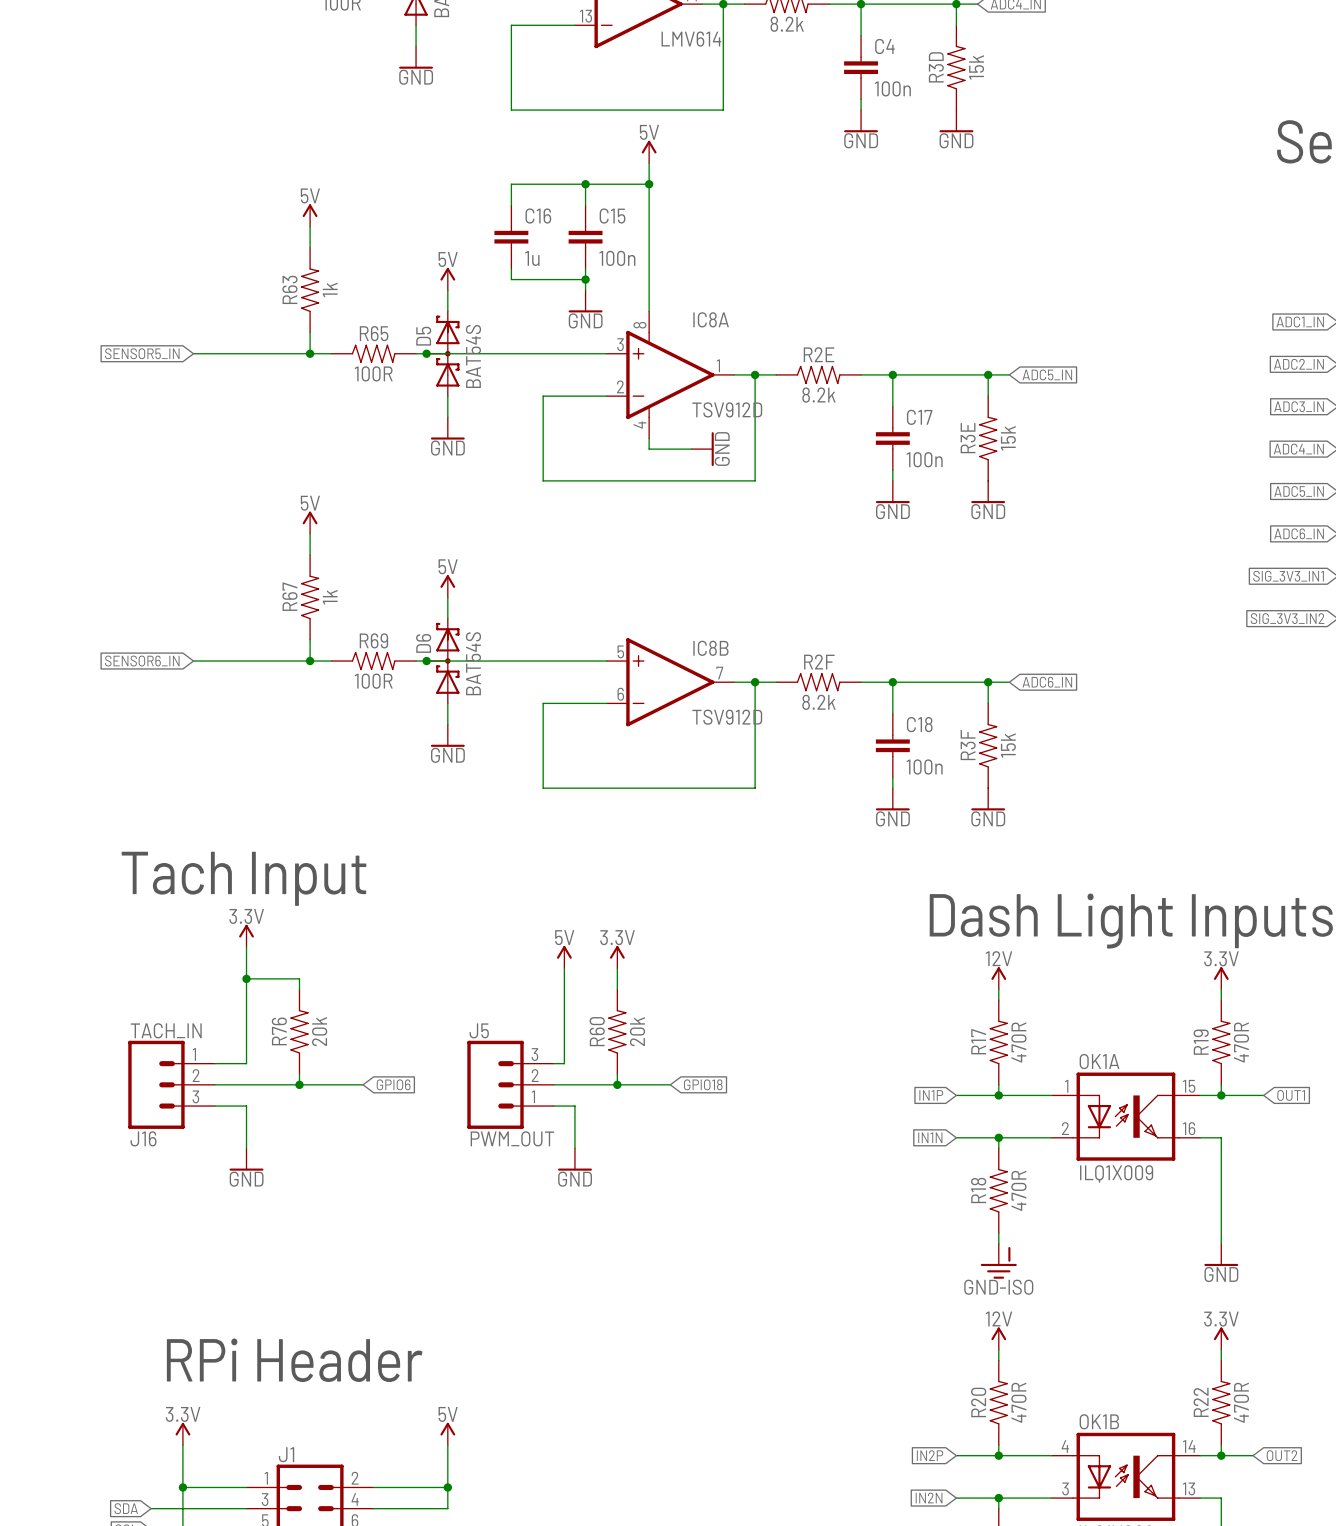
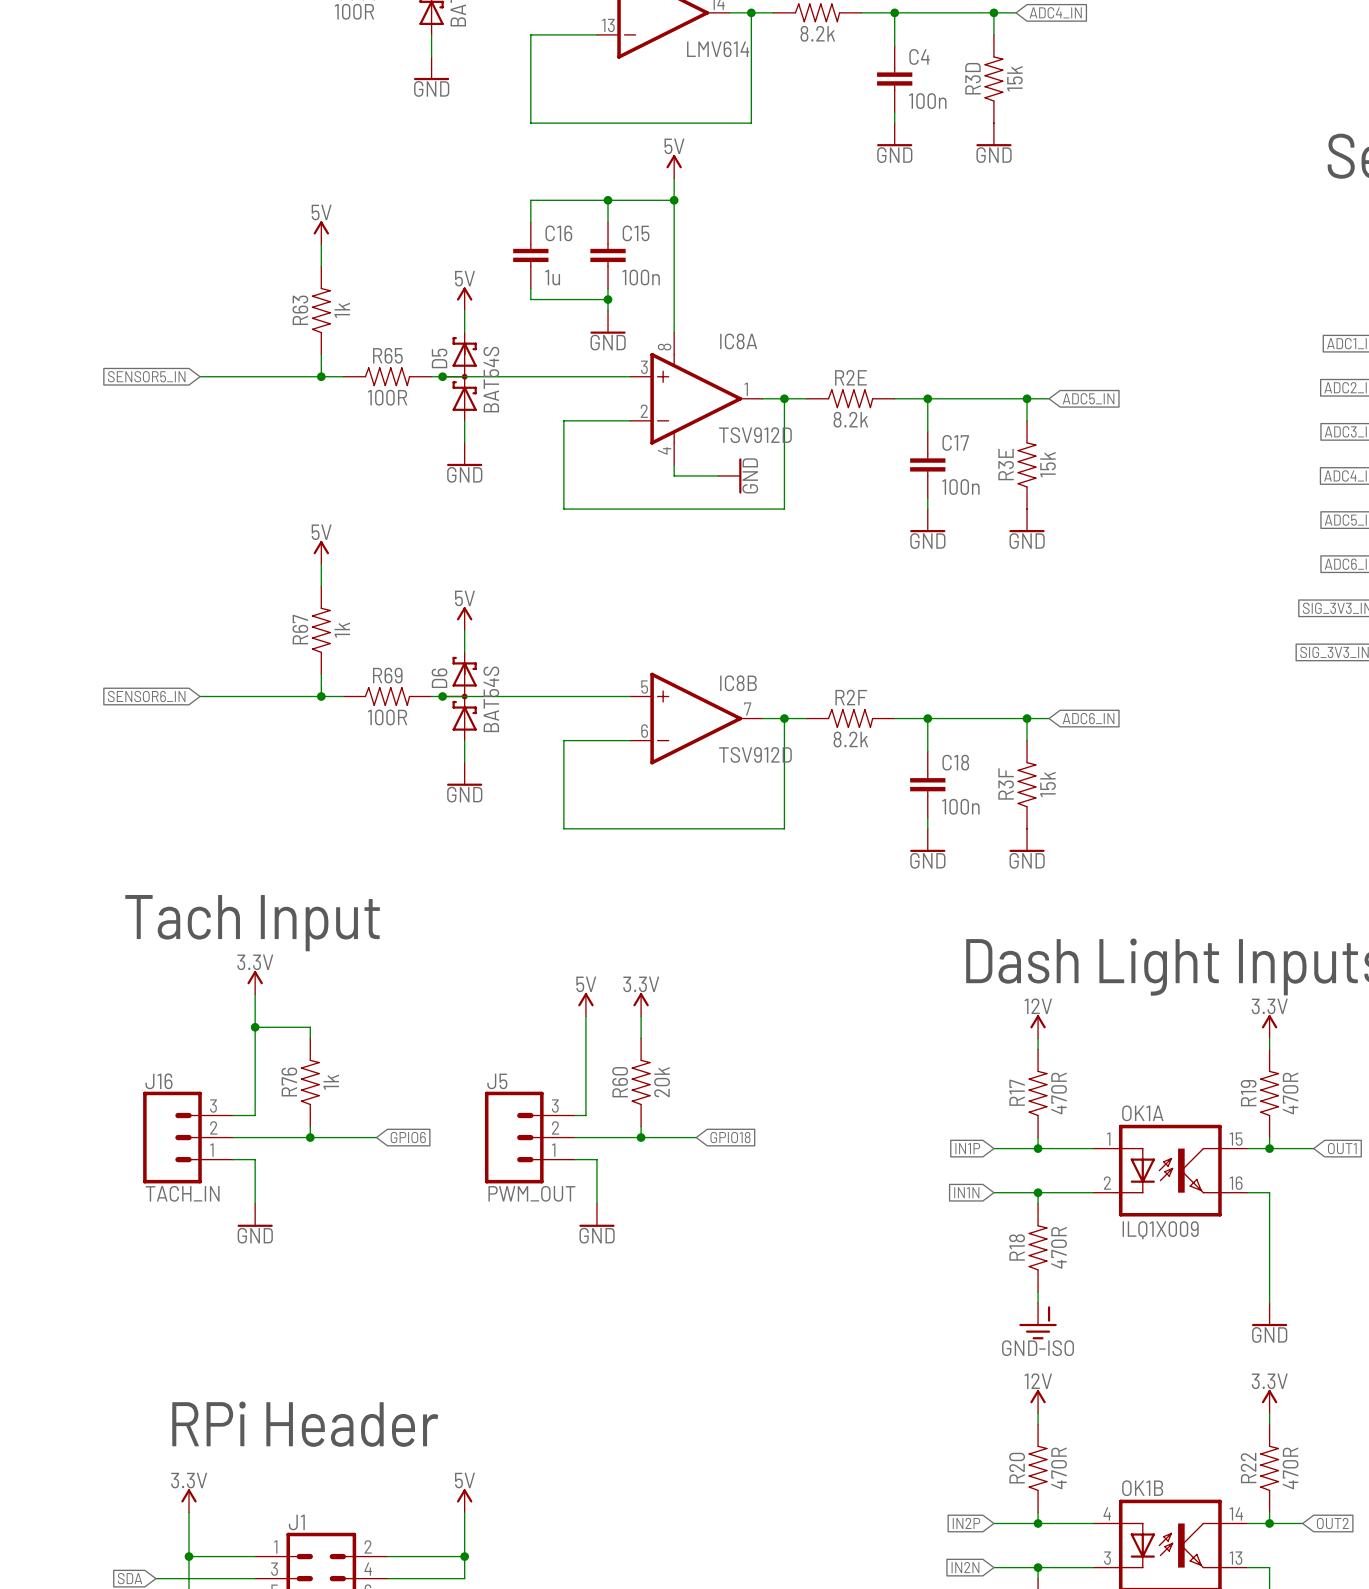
R76 value: 20k (319, 1031) -> 1k (331, 1082)
J16 flip: as is (156, 1084) -> up-down (172, 1137)

